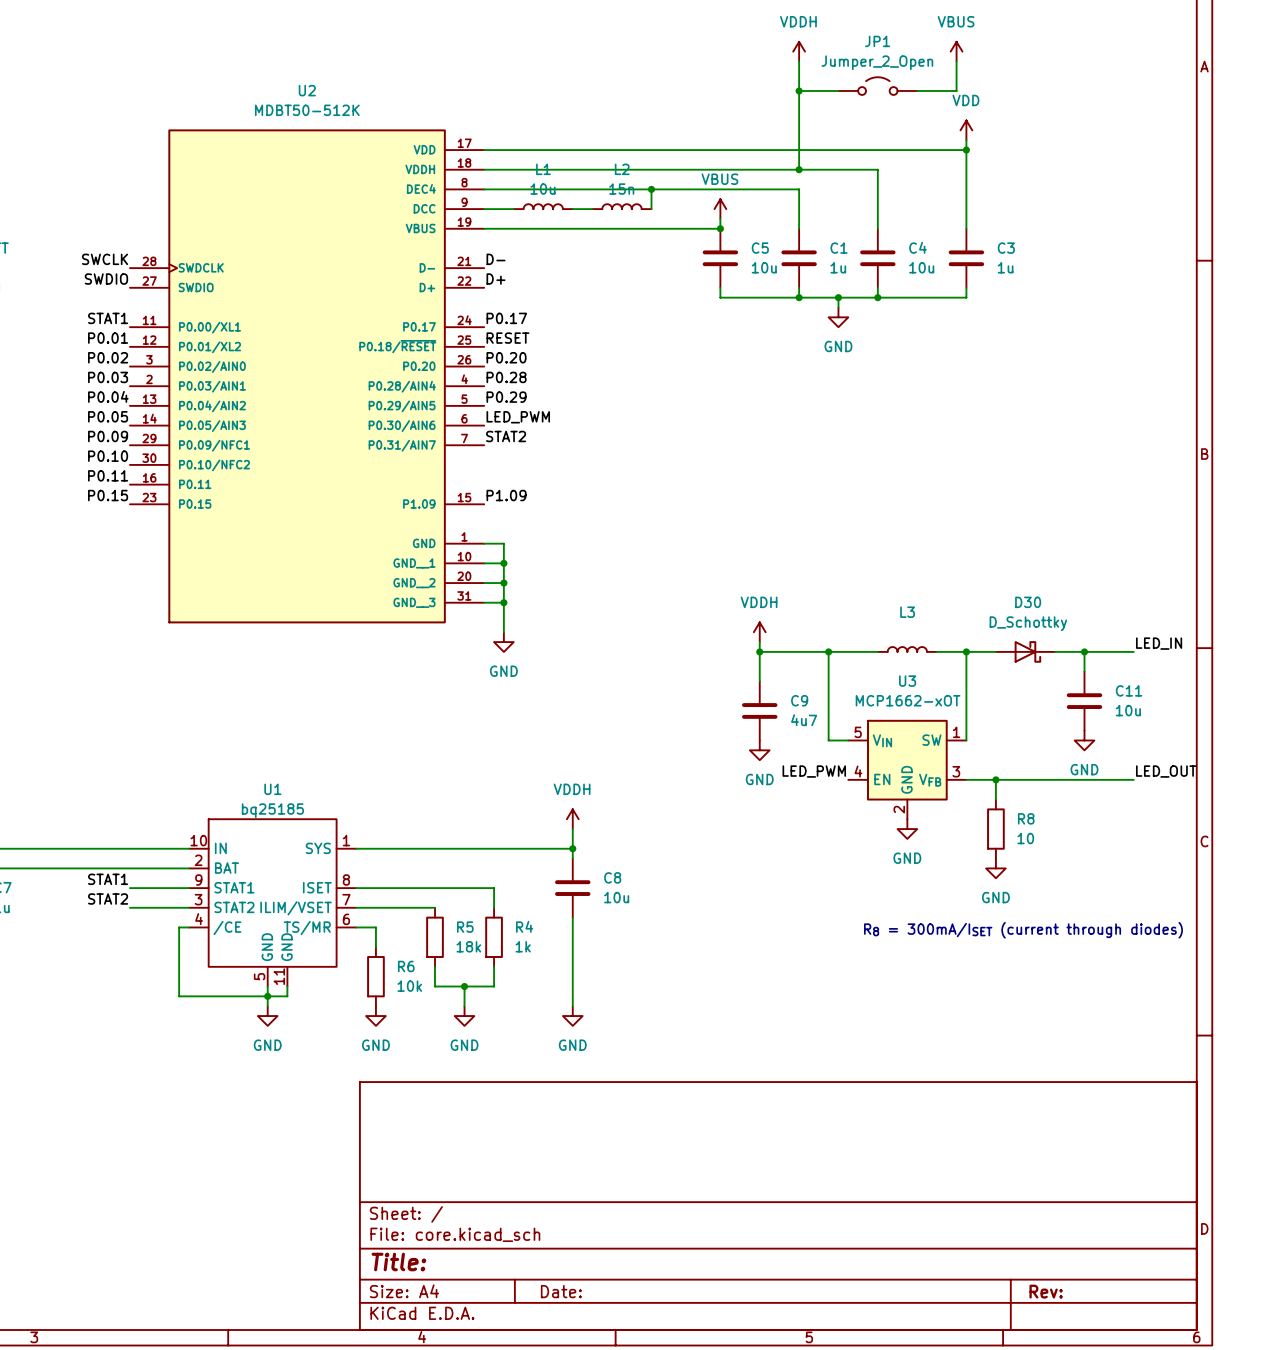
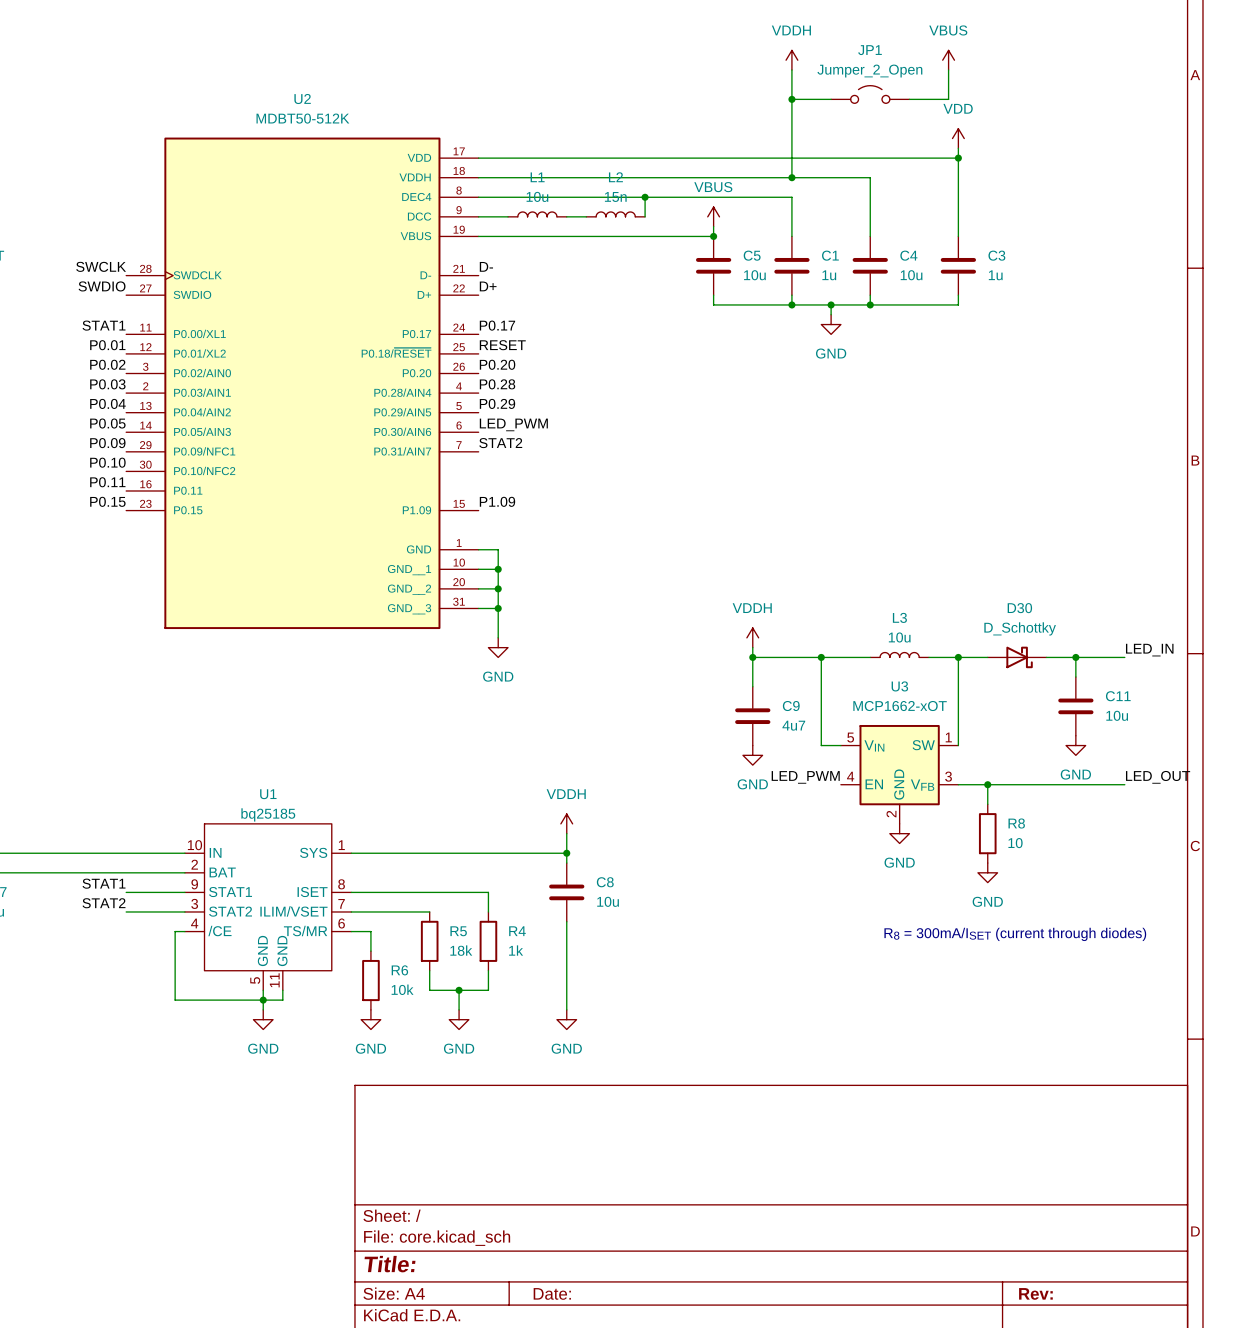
L3 value: none -> 10u (899, 637)

